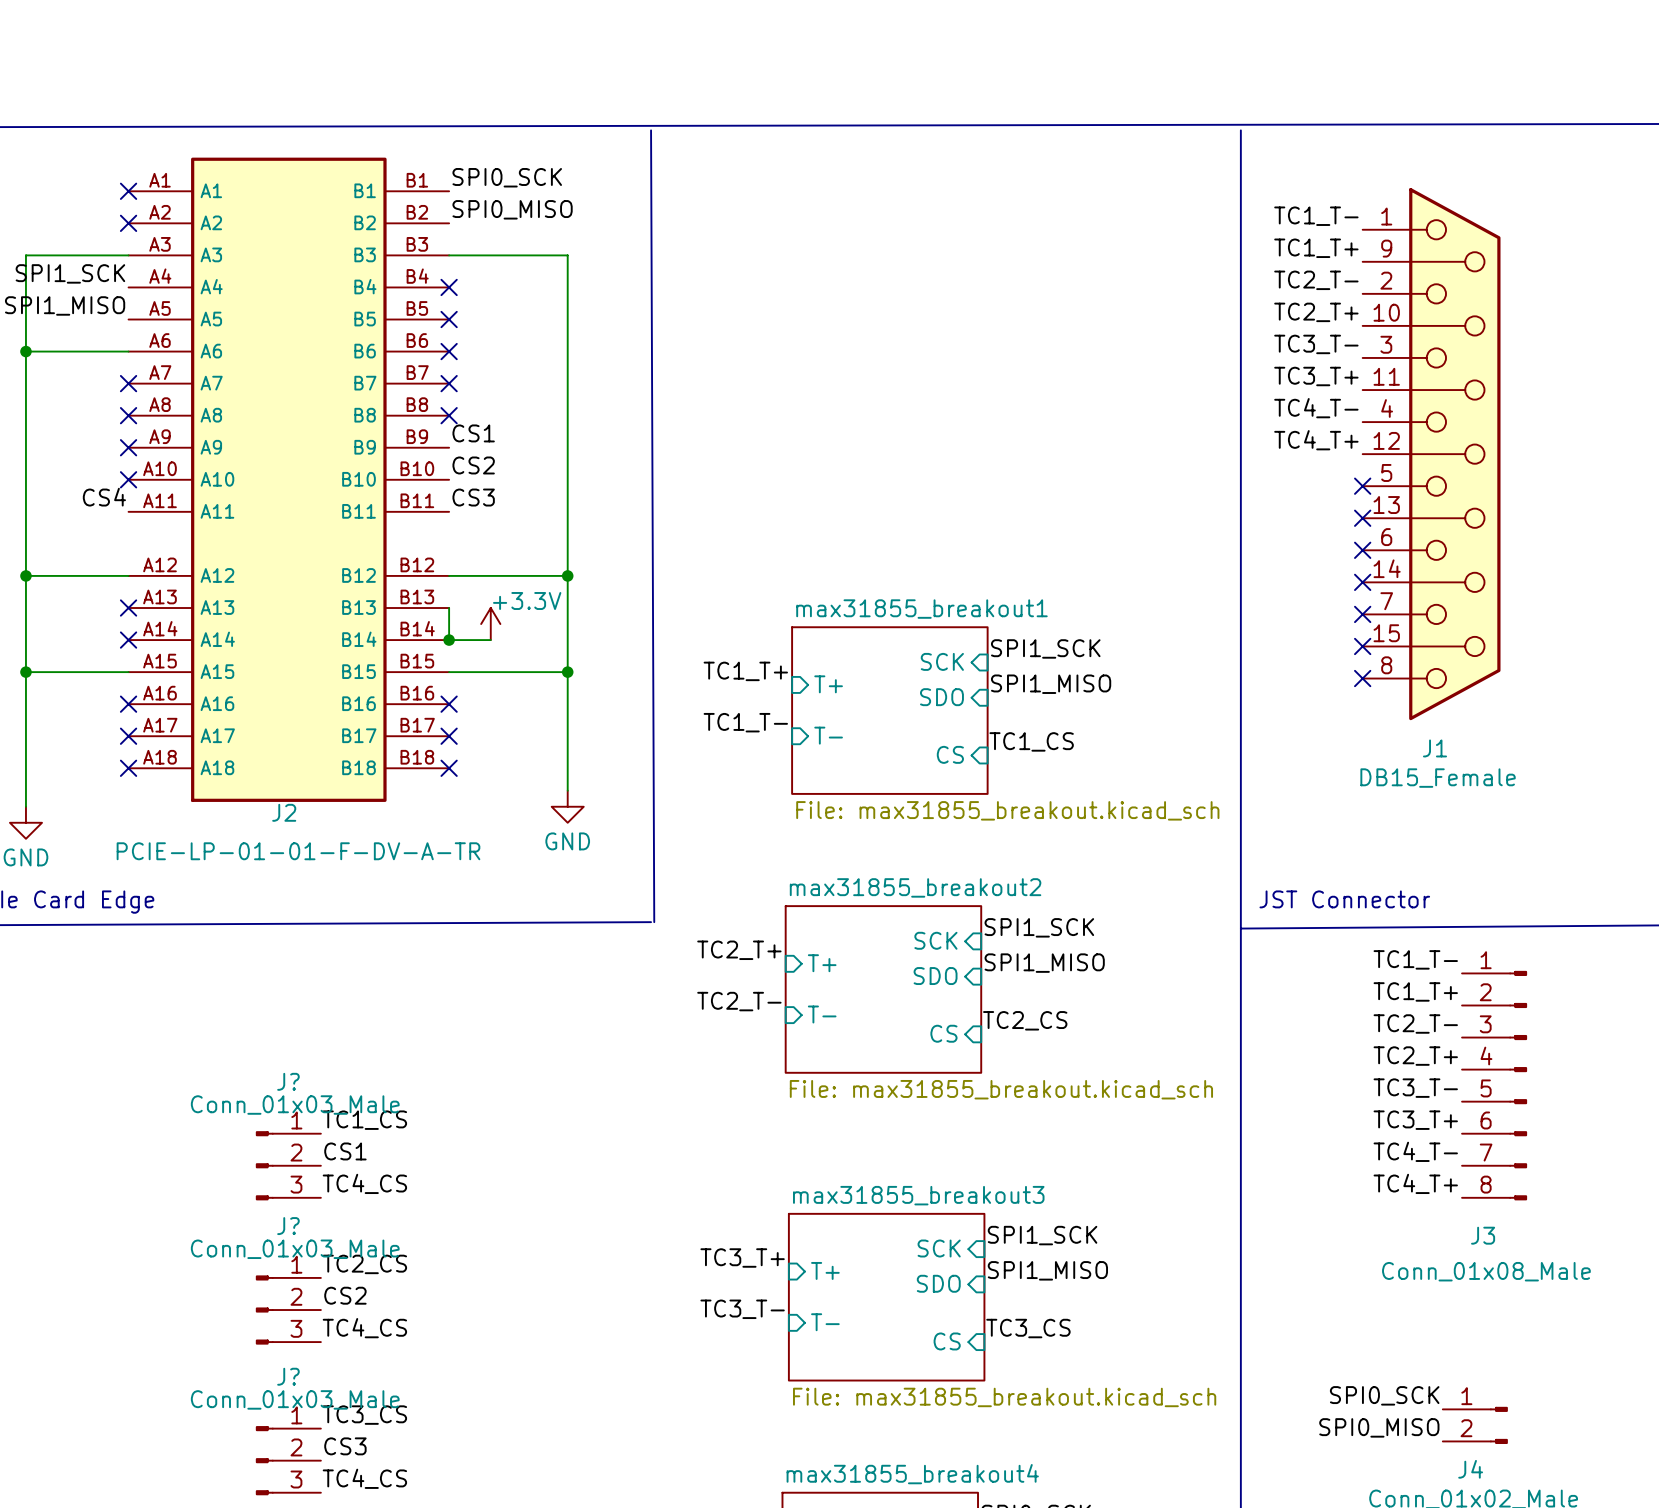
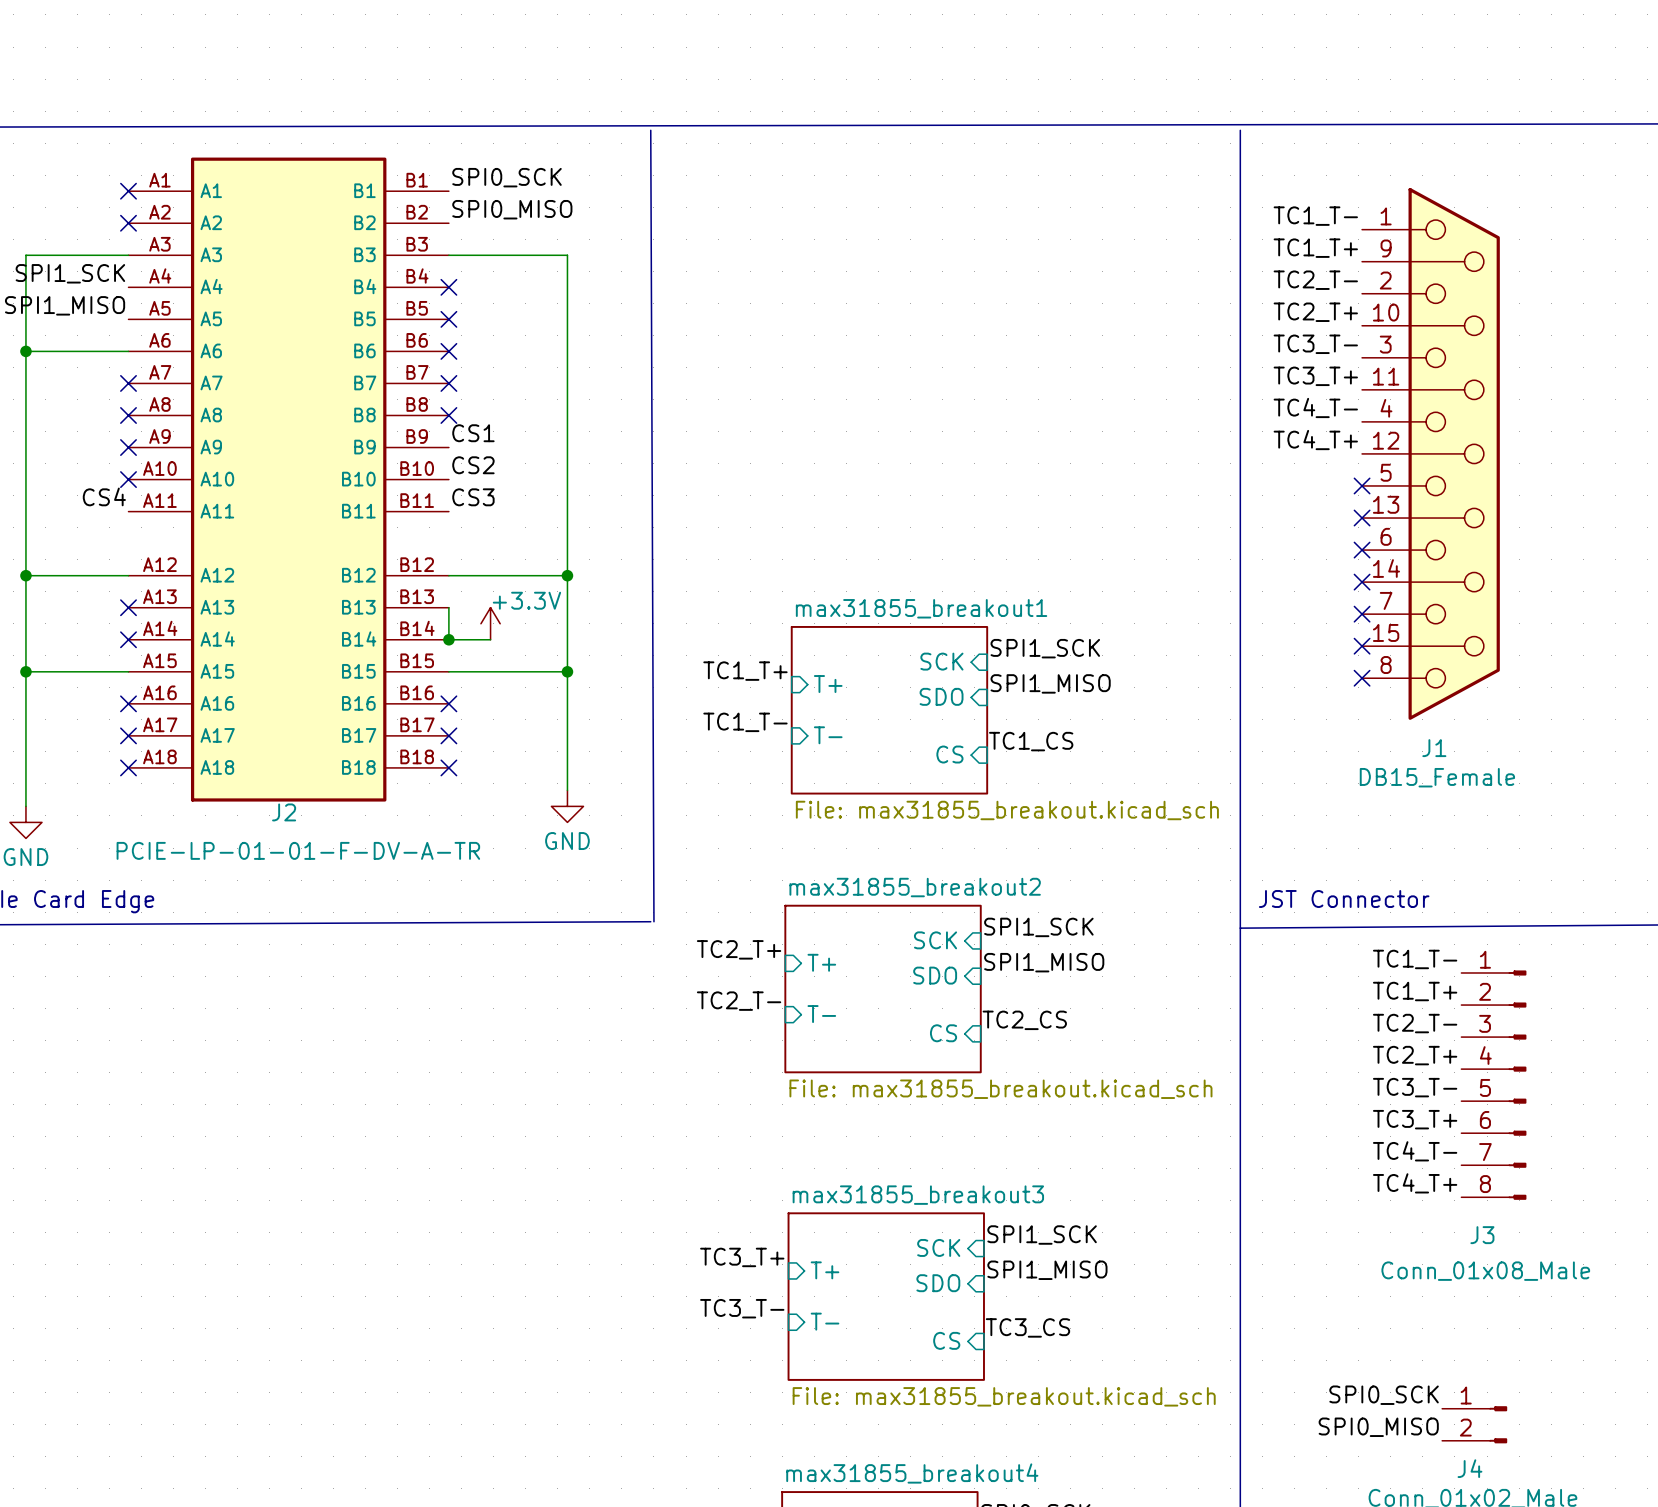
label: TC1_CS (364, 1120) -> none
label: CS1 (345, 1151) -> none
J?: Conn_01x03_Male (288, 1165) -> none
label: TC4_CS (364, 1183) -> none
label: TC2_CS (364, 1264) -> none
label: CS2 (345, 1295) -> none
J?: Conn_01x03_Male (288, 1310) -> none
label: TC4_CS (364, 1328) -> none
label: TC3_CS (364, 1415) -> none
label: CS3 (345, 1446) -> none
J?: Conn_01x03_Male (288, 1460) -> none
label: TC4_CS (364, 1478) -> none

